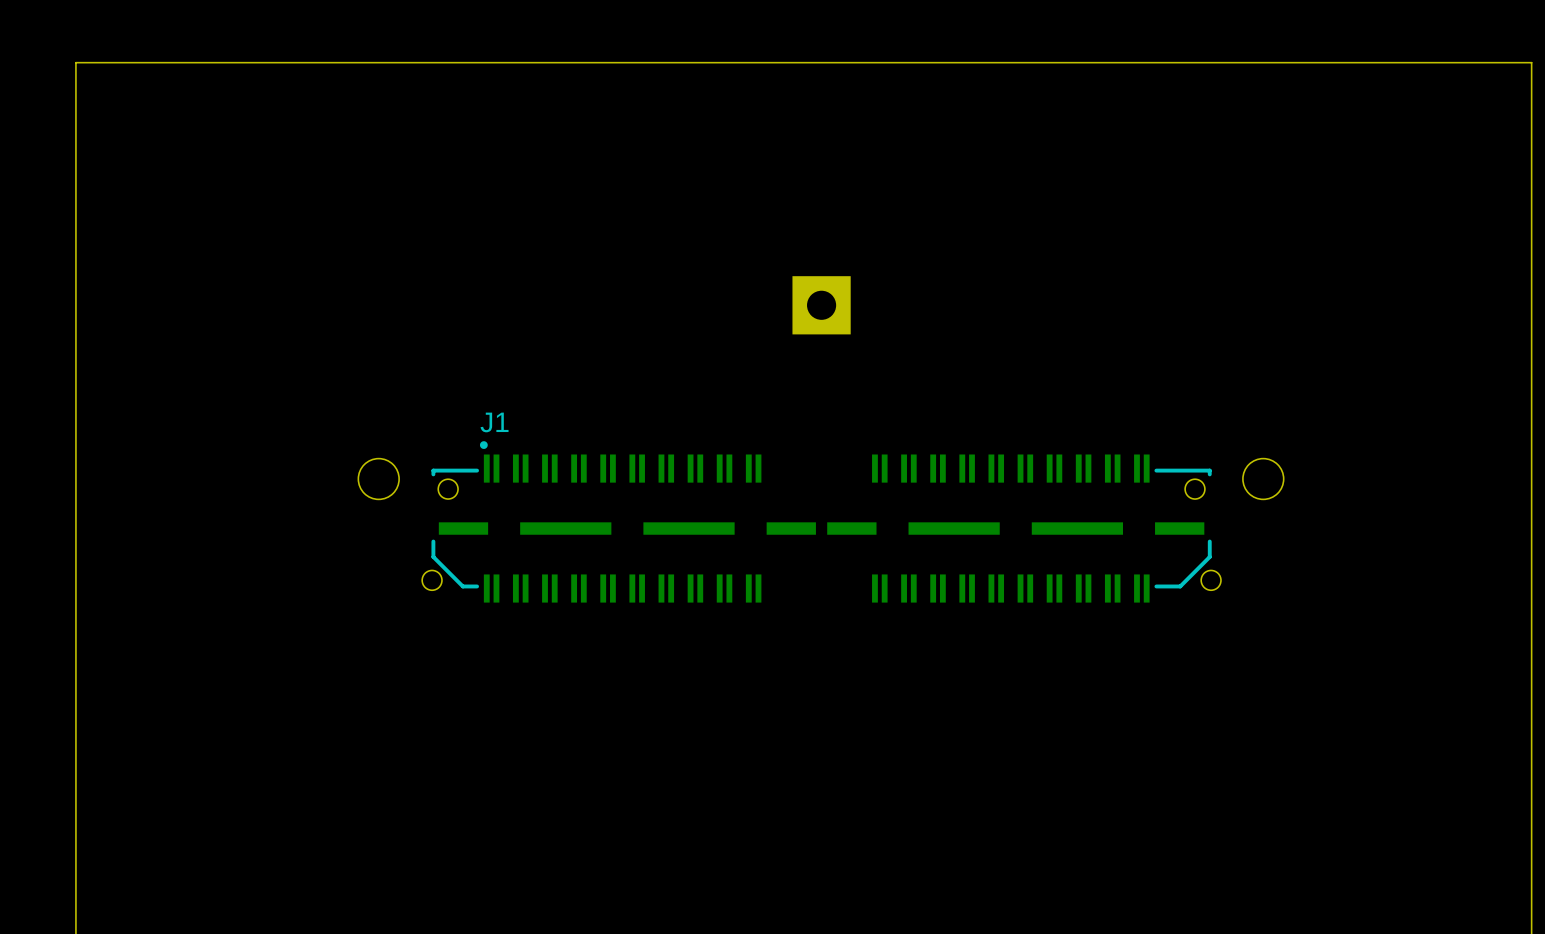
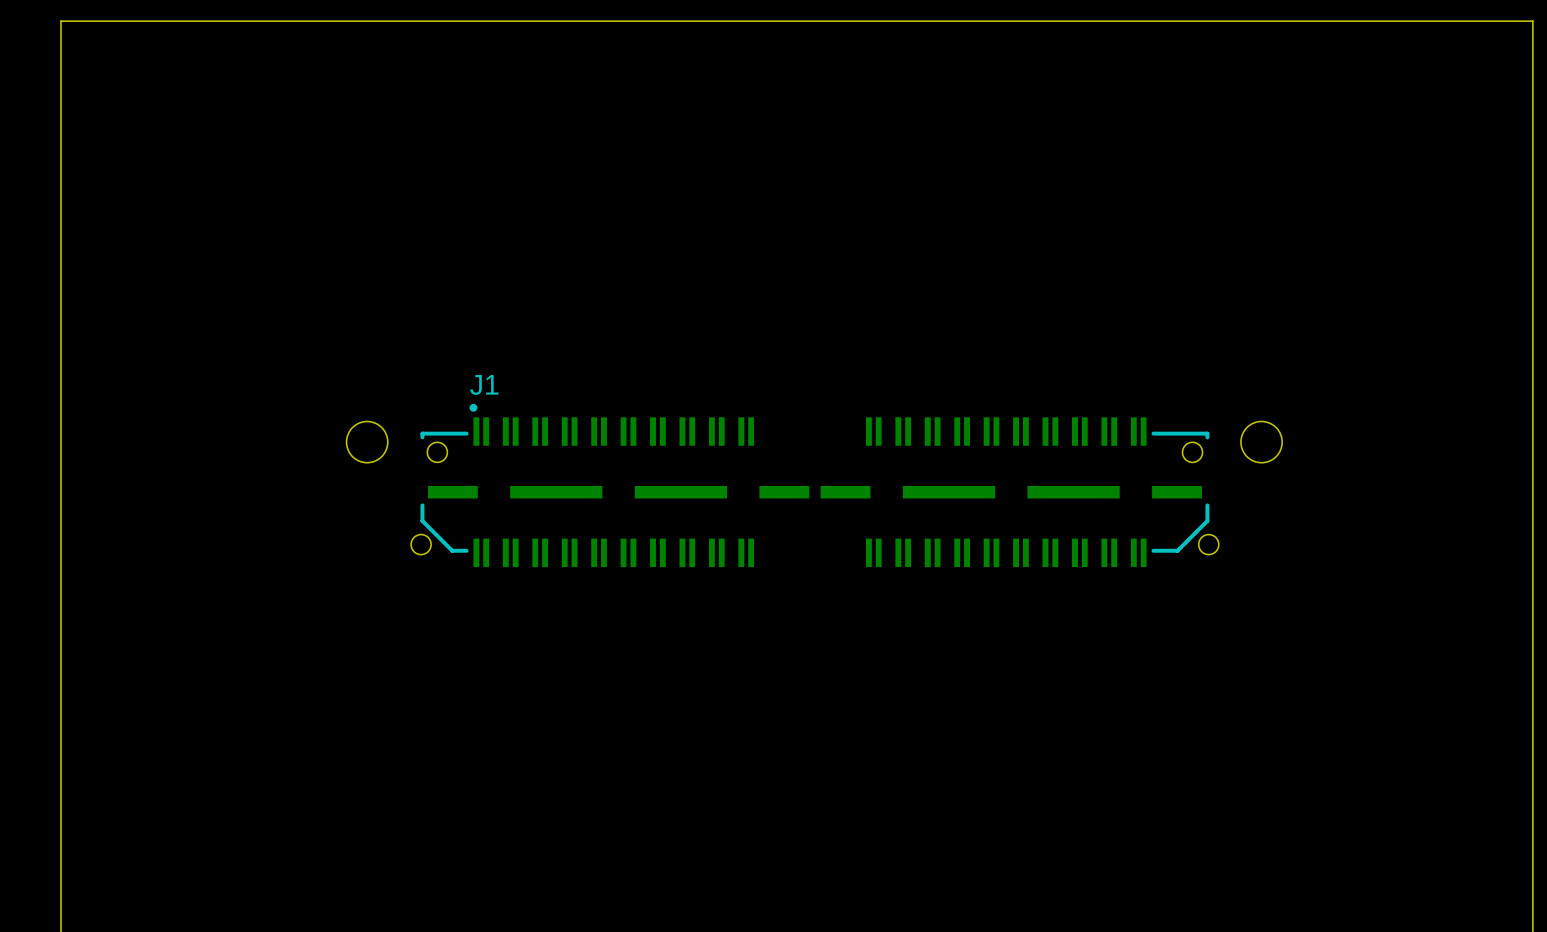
part: (821, 305) -> none

